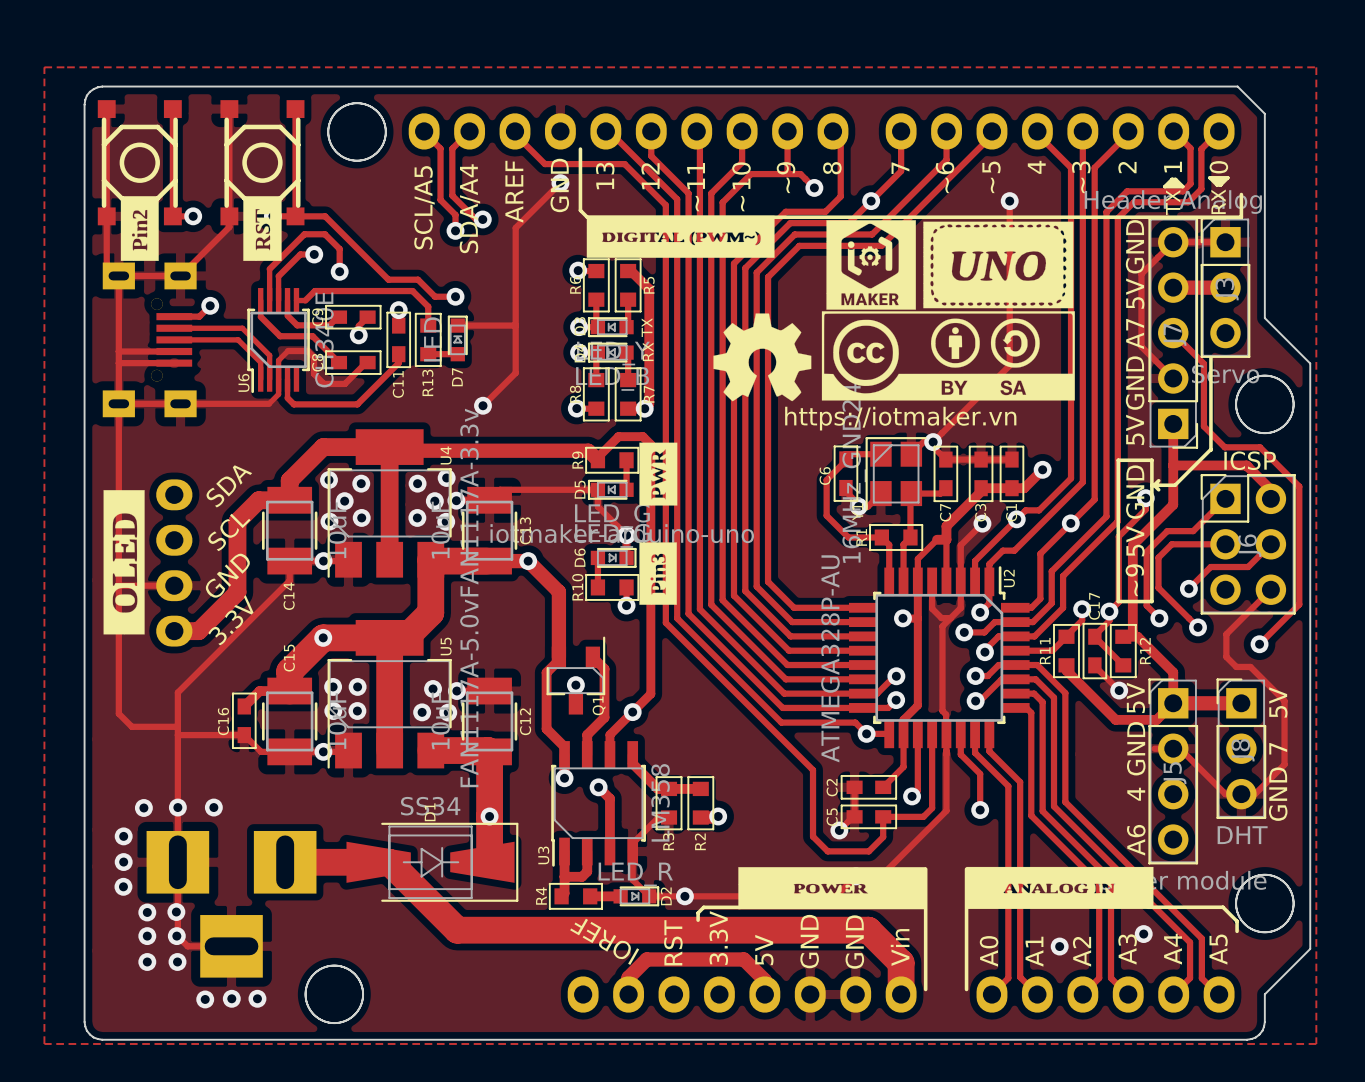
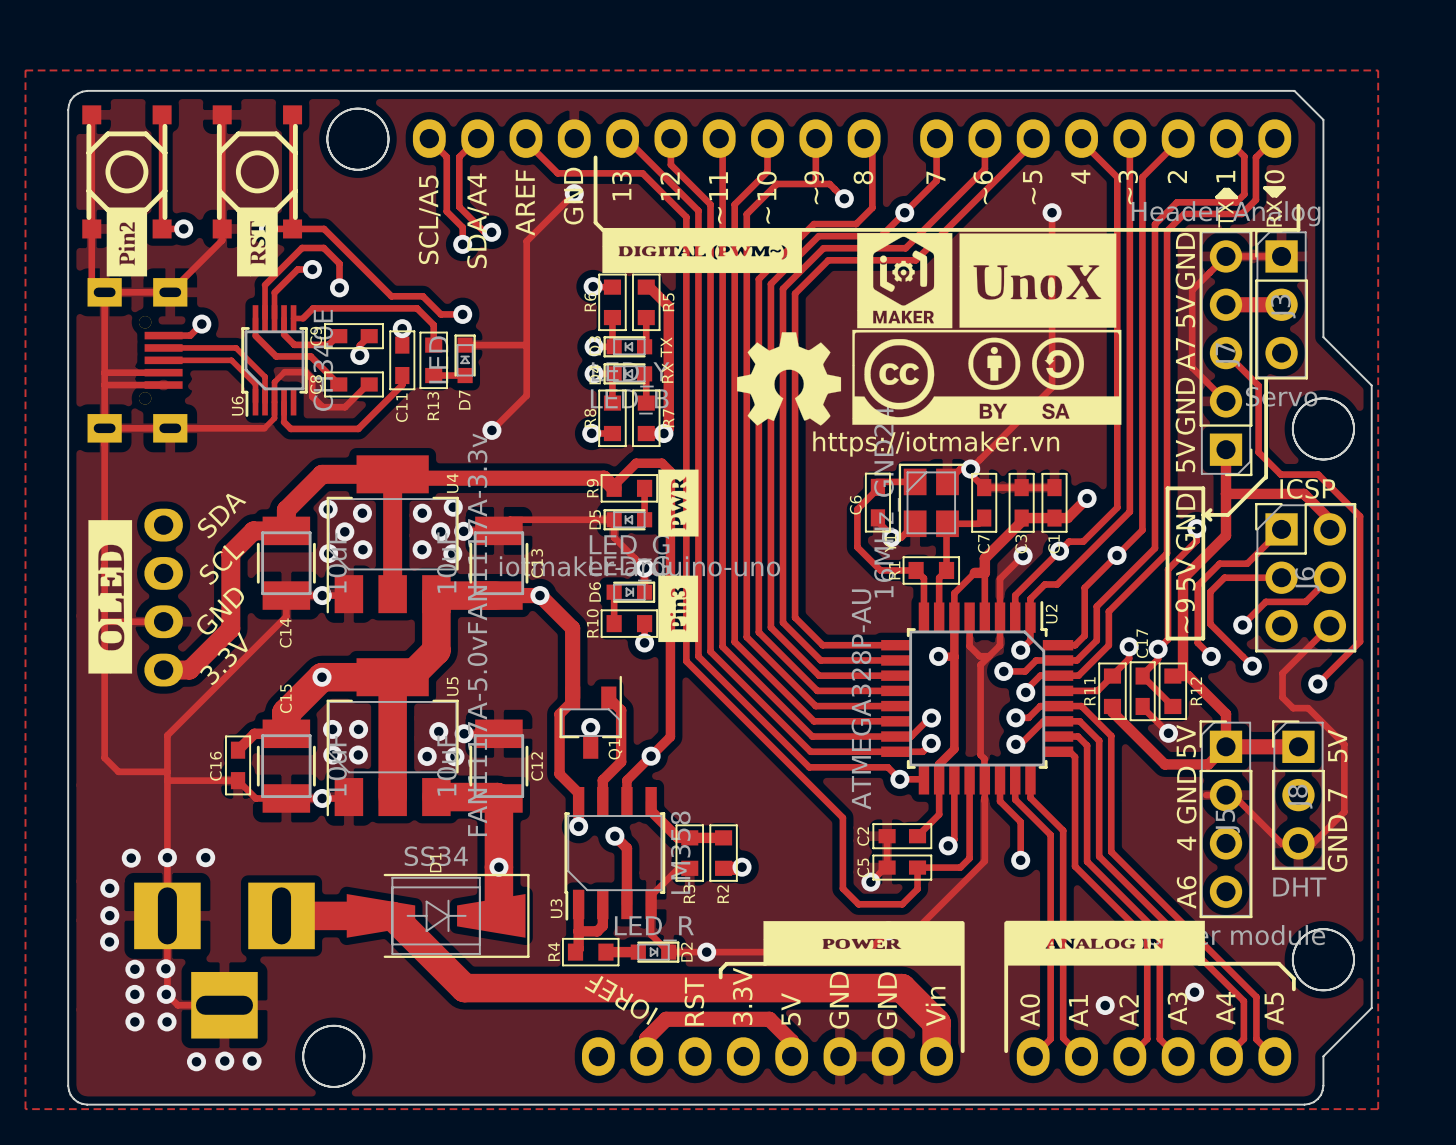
drawing shape: [923, 221, 1074, 309] -> [959, 233, 1117, 328]

